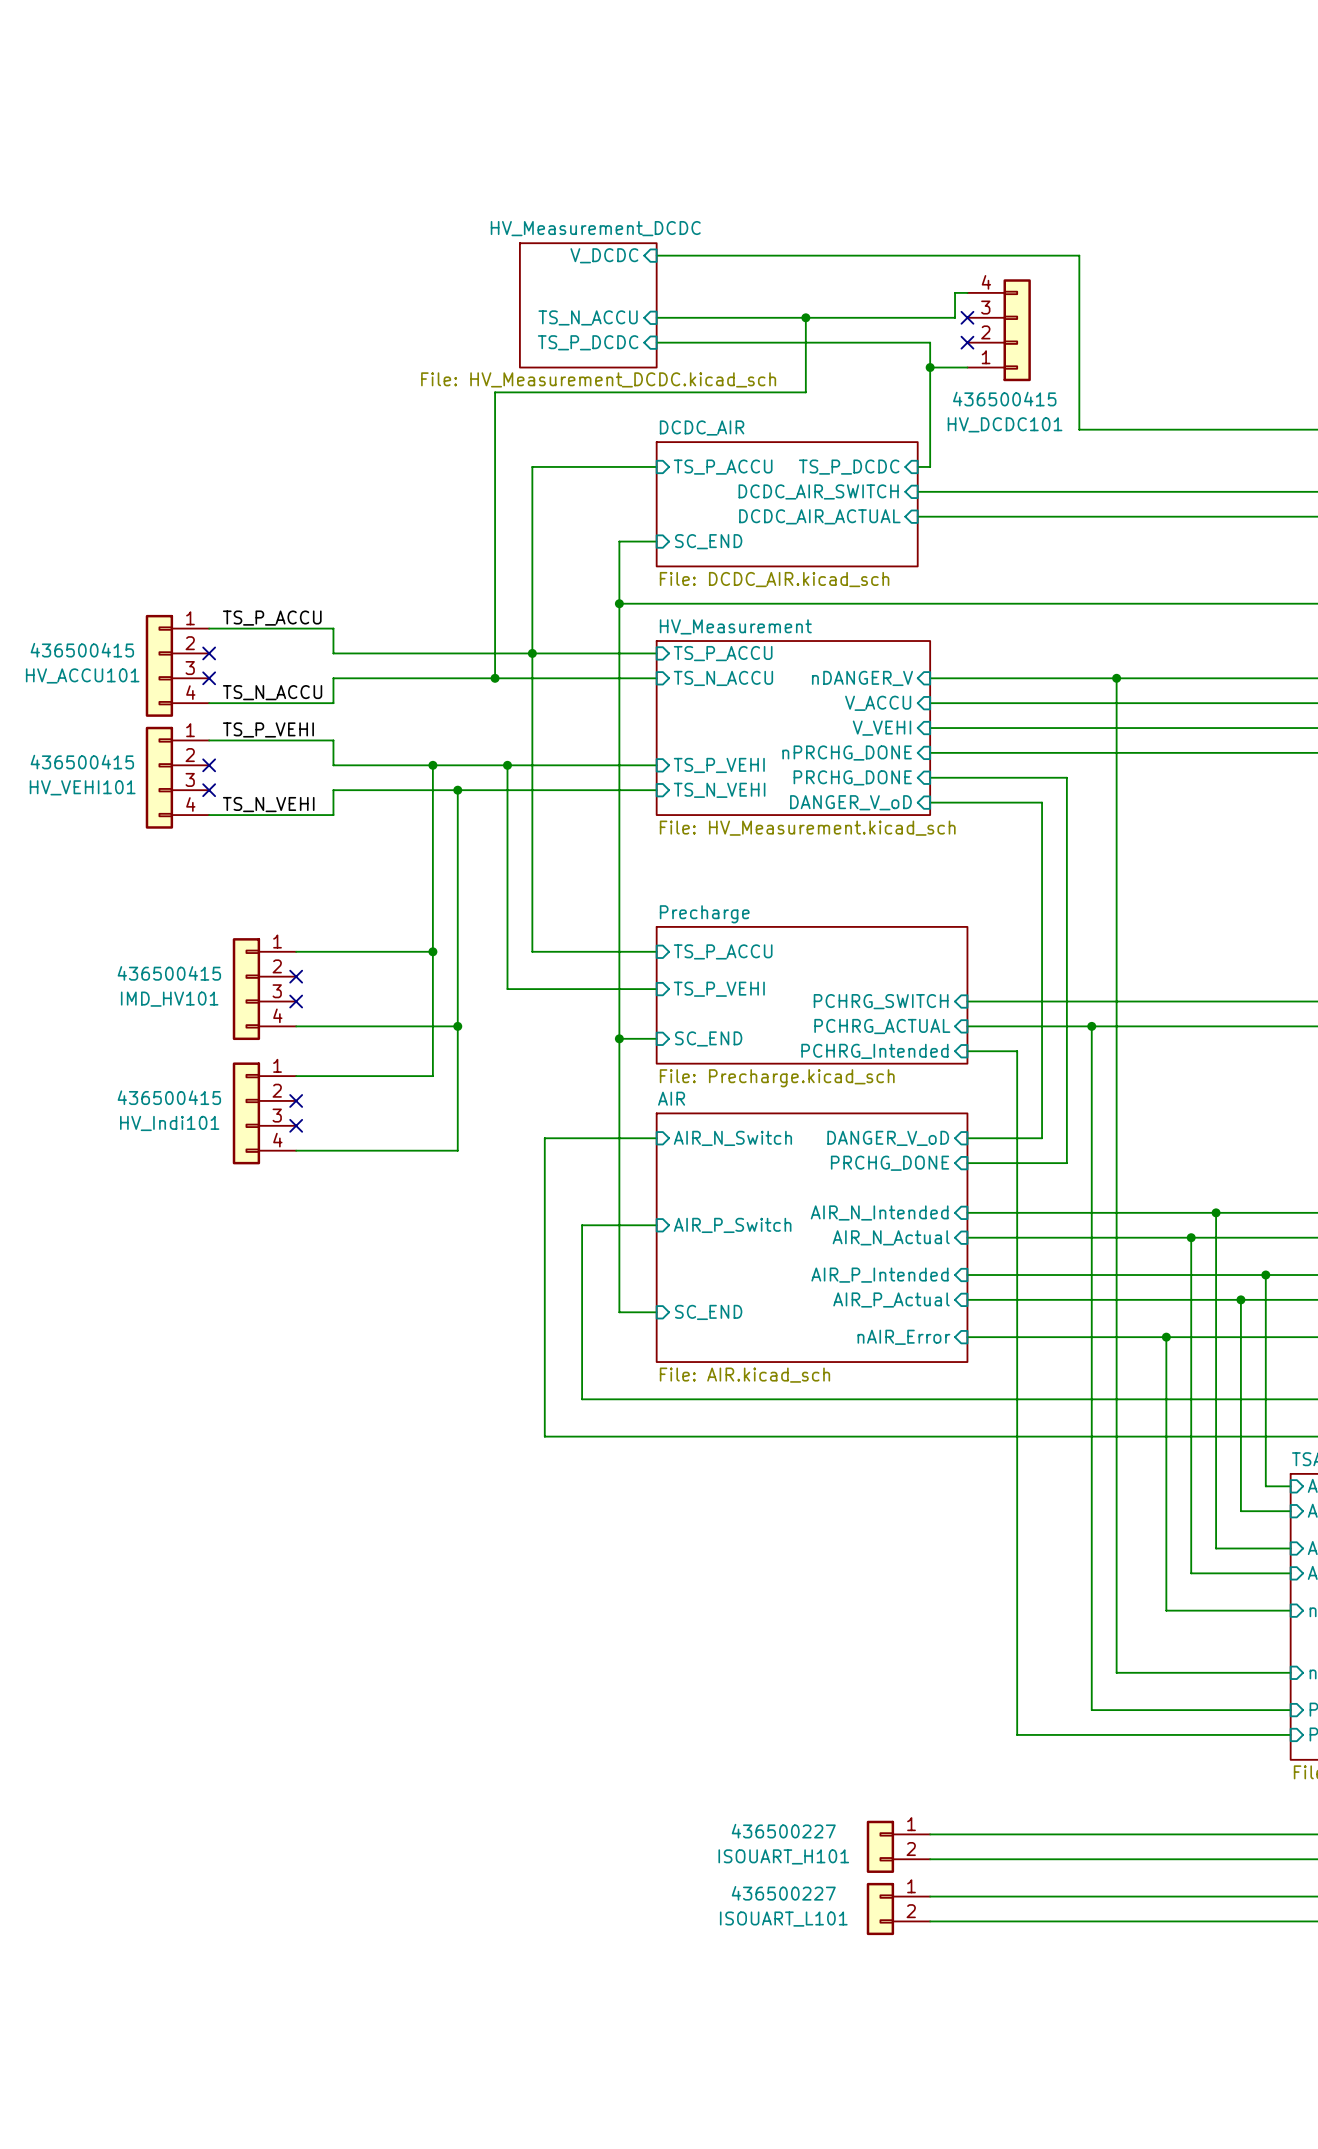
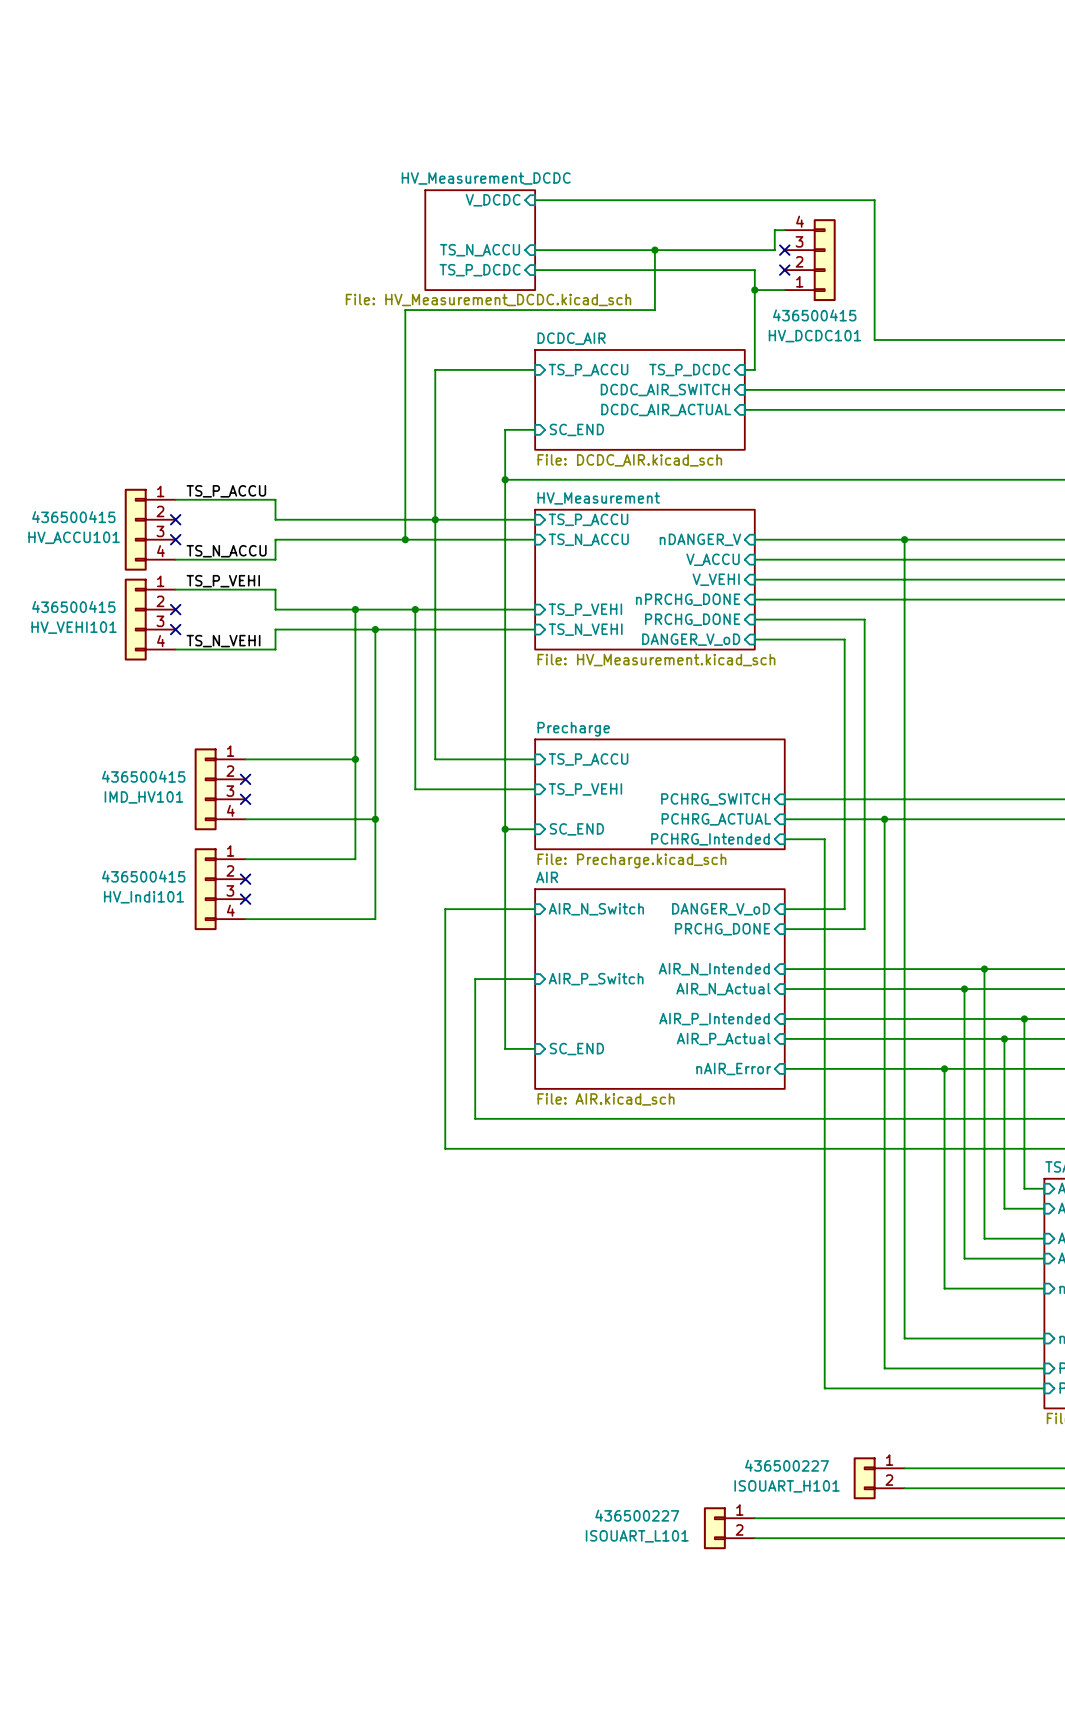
wire: (930, 1834) (1116, 1834) -> none
ISOUART_H101 position: (898, 1846) -> (879, 1478)
wire: (930, 1859) (1116, 1859) -> none

